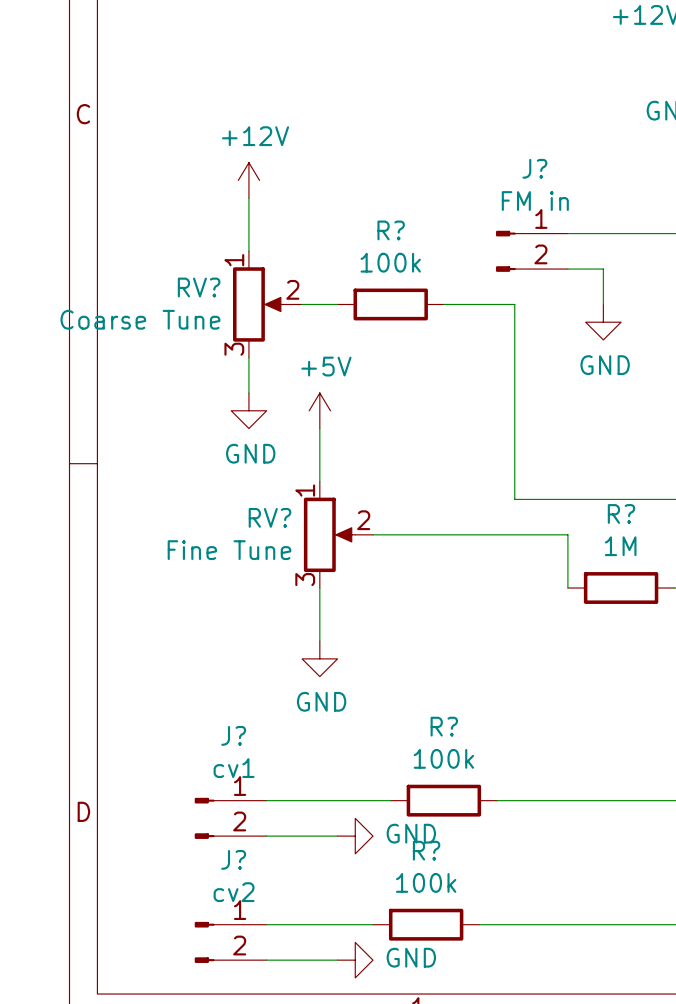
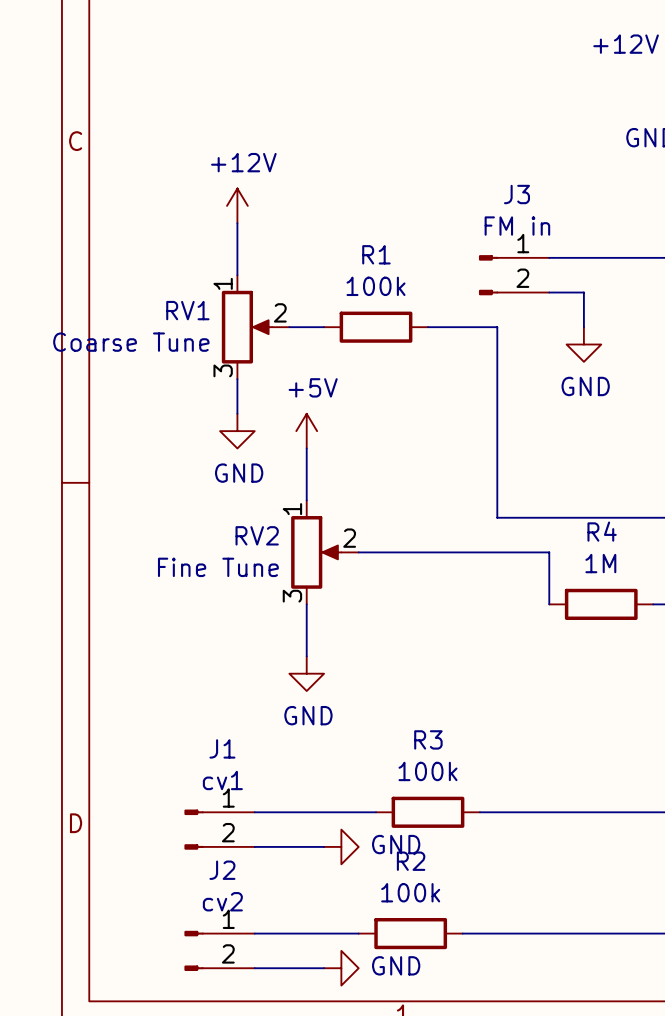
J? name: J? (534, 168) -> J3 (516, 194)
R? name: R? (391, 230) -> R1 (376, 254)
RV? name: RV? (199, 287) -> RV1 (187, 310)
R? name: R? (621, 513) -> R4 (602, 531)
RV? name: RV? (269, 517) -> RV2 (257, 535)
R? name: R? (444, 726) -> R3 (428, 739)
J? name: J? (233, 735) -> J1 (222, 748)
R? name: R? (426, 850) -> R2 (411, 861)
J? name: J? (233, 859) -> J2 (222, 870)

